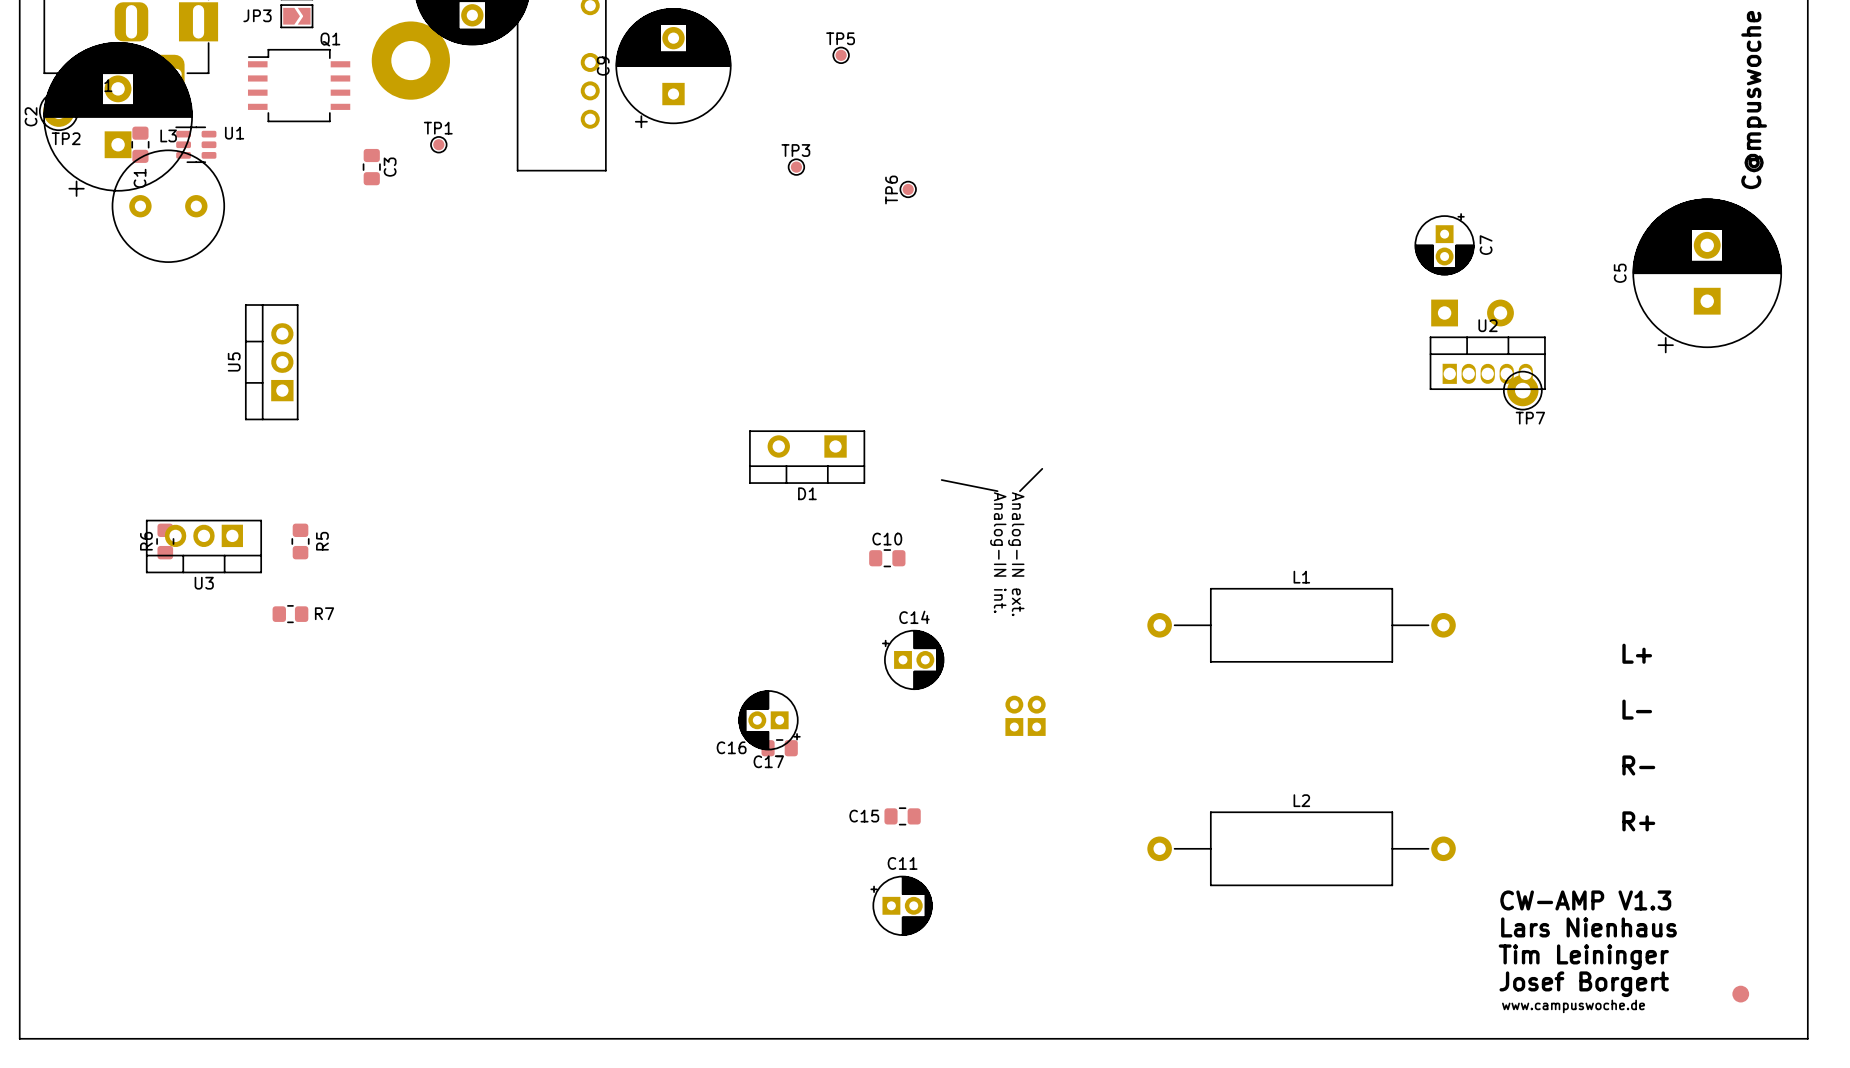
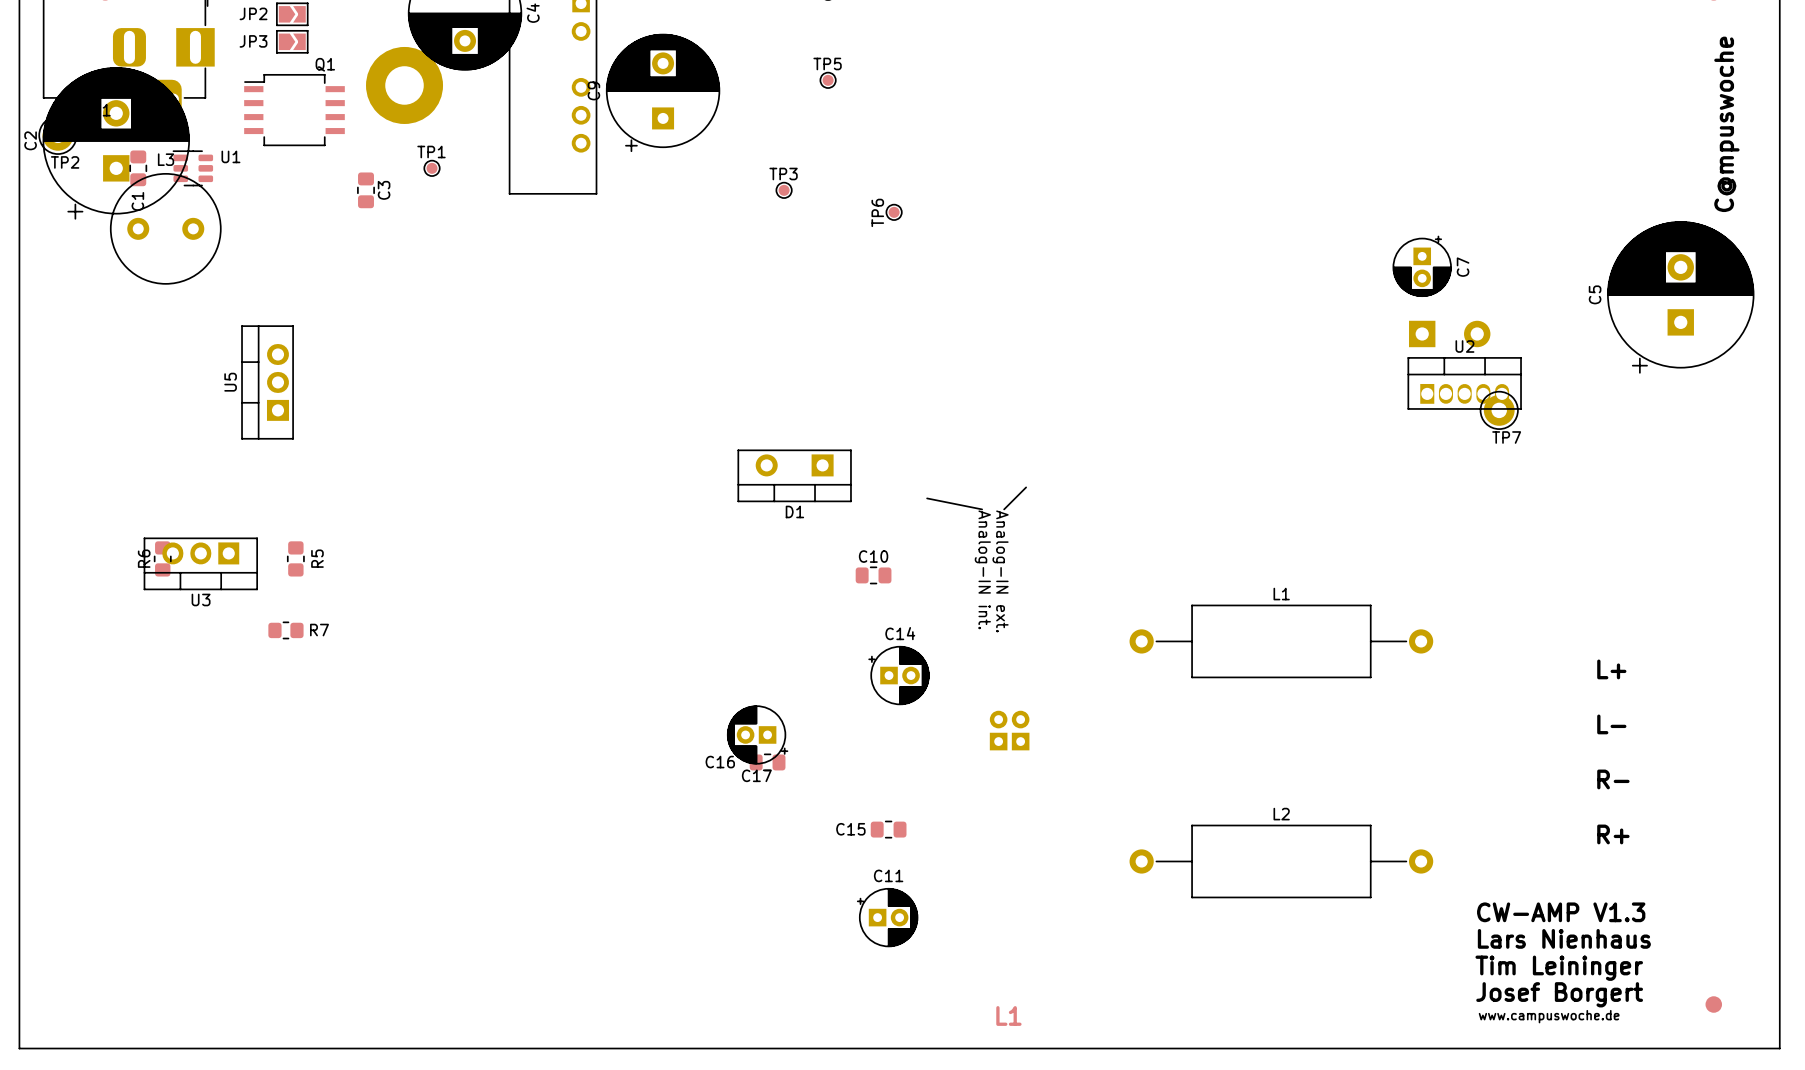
text: none -> L1 (1008, 1015)

